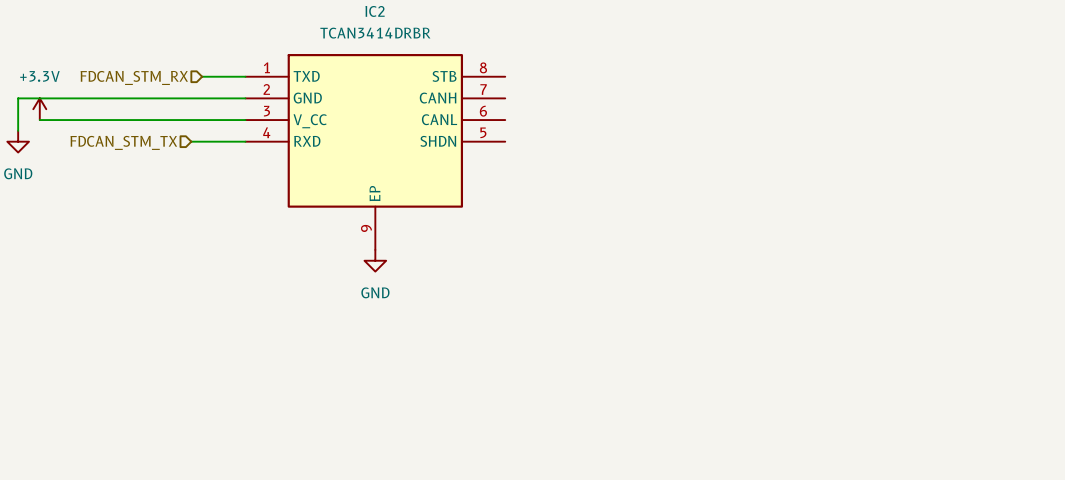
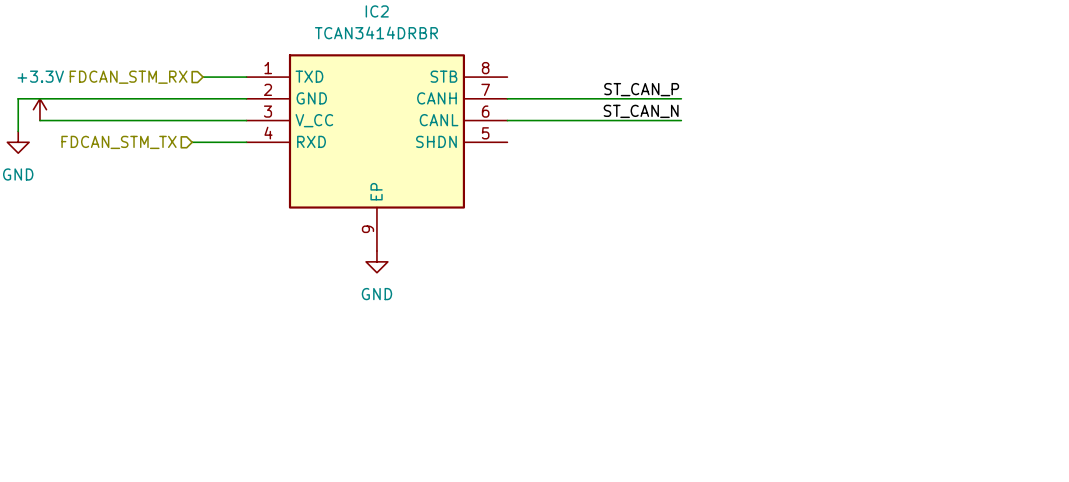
label: none -> ST_CAN_P (641, 89)
wire: none -> (507, 98) (681, 98)
label: none -> ST_CAN_N (641, 111)
wire: none -> (507, 120) (681, 120)

